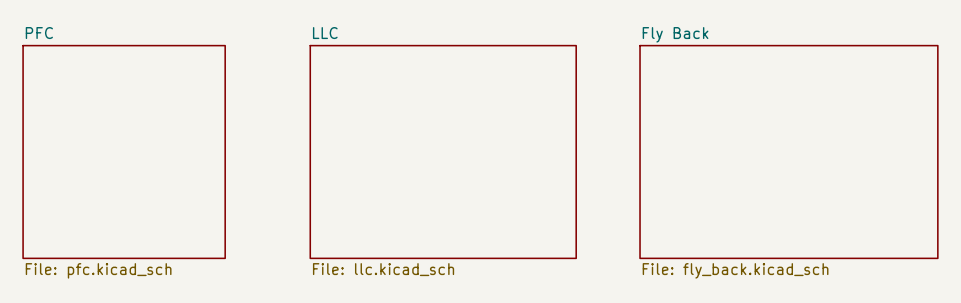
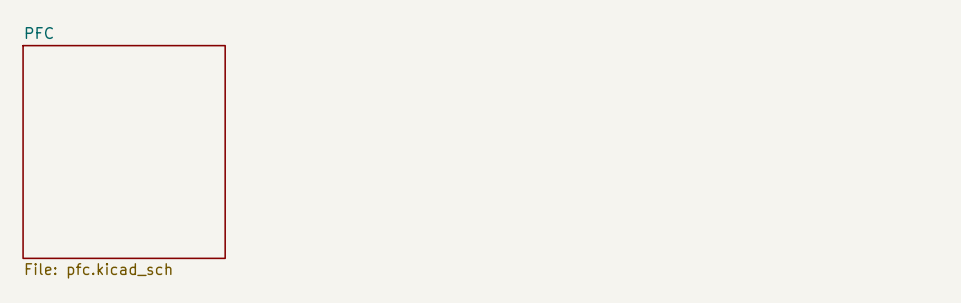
sheet LLC: File: llc.kicad_sch (443, 151) -> none
sheet Fly Back: File: fly_back.kicad_sch (788, 151) -> none

